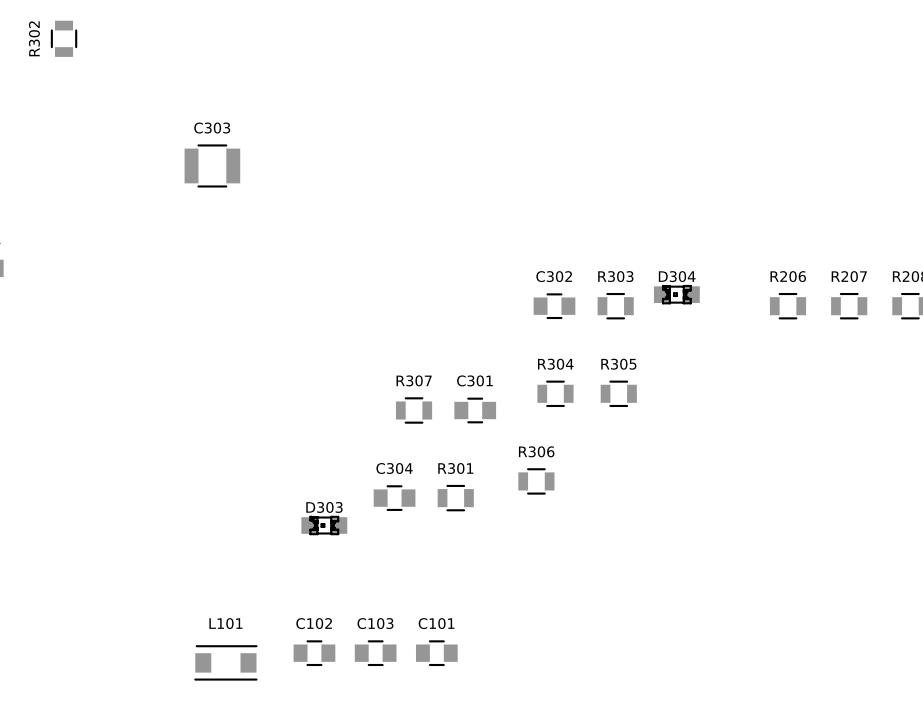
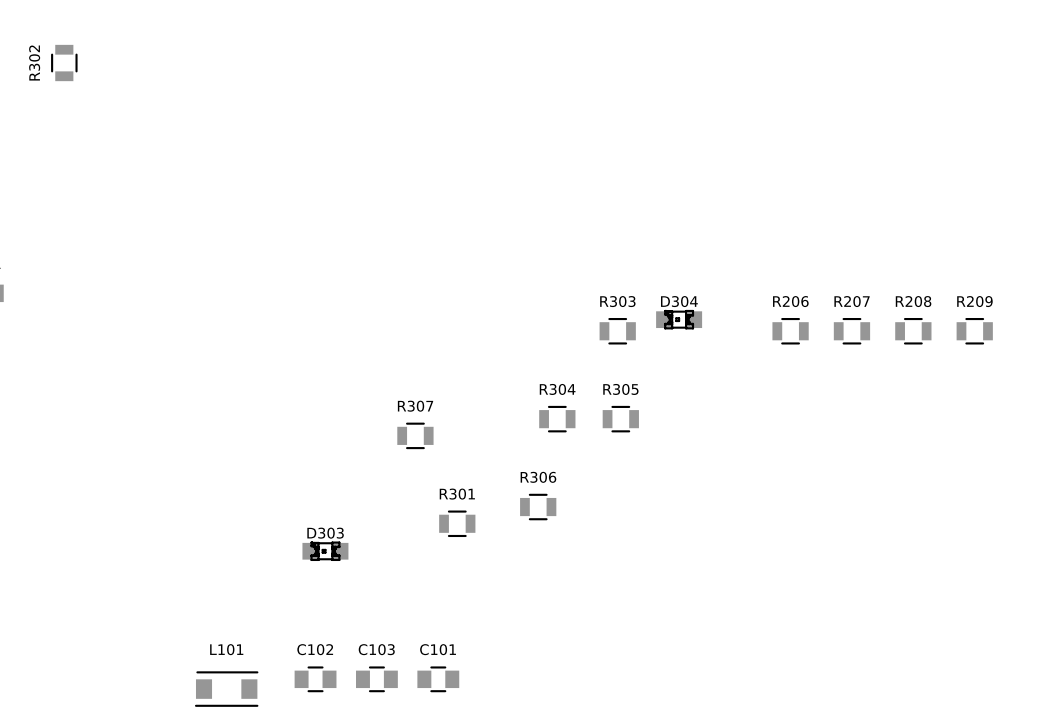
C303: (212, 165) -> none
C302: (554, 306) -> none
C301: (475, 410) -> none
C304: (394, 498) -> none

